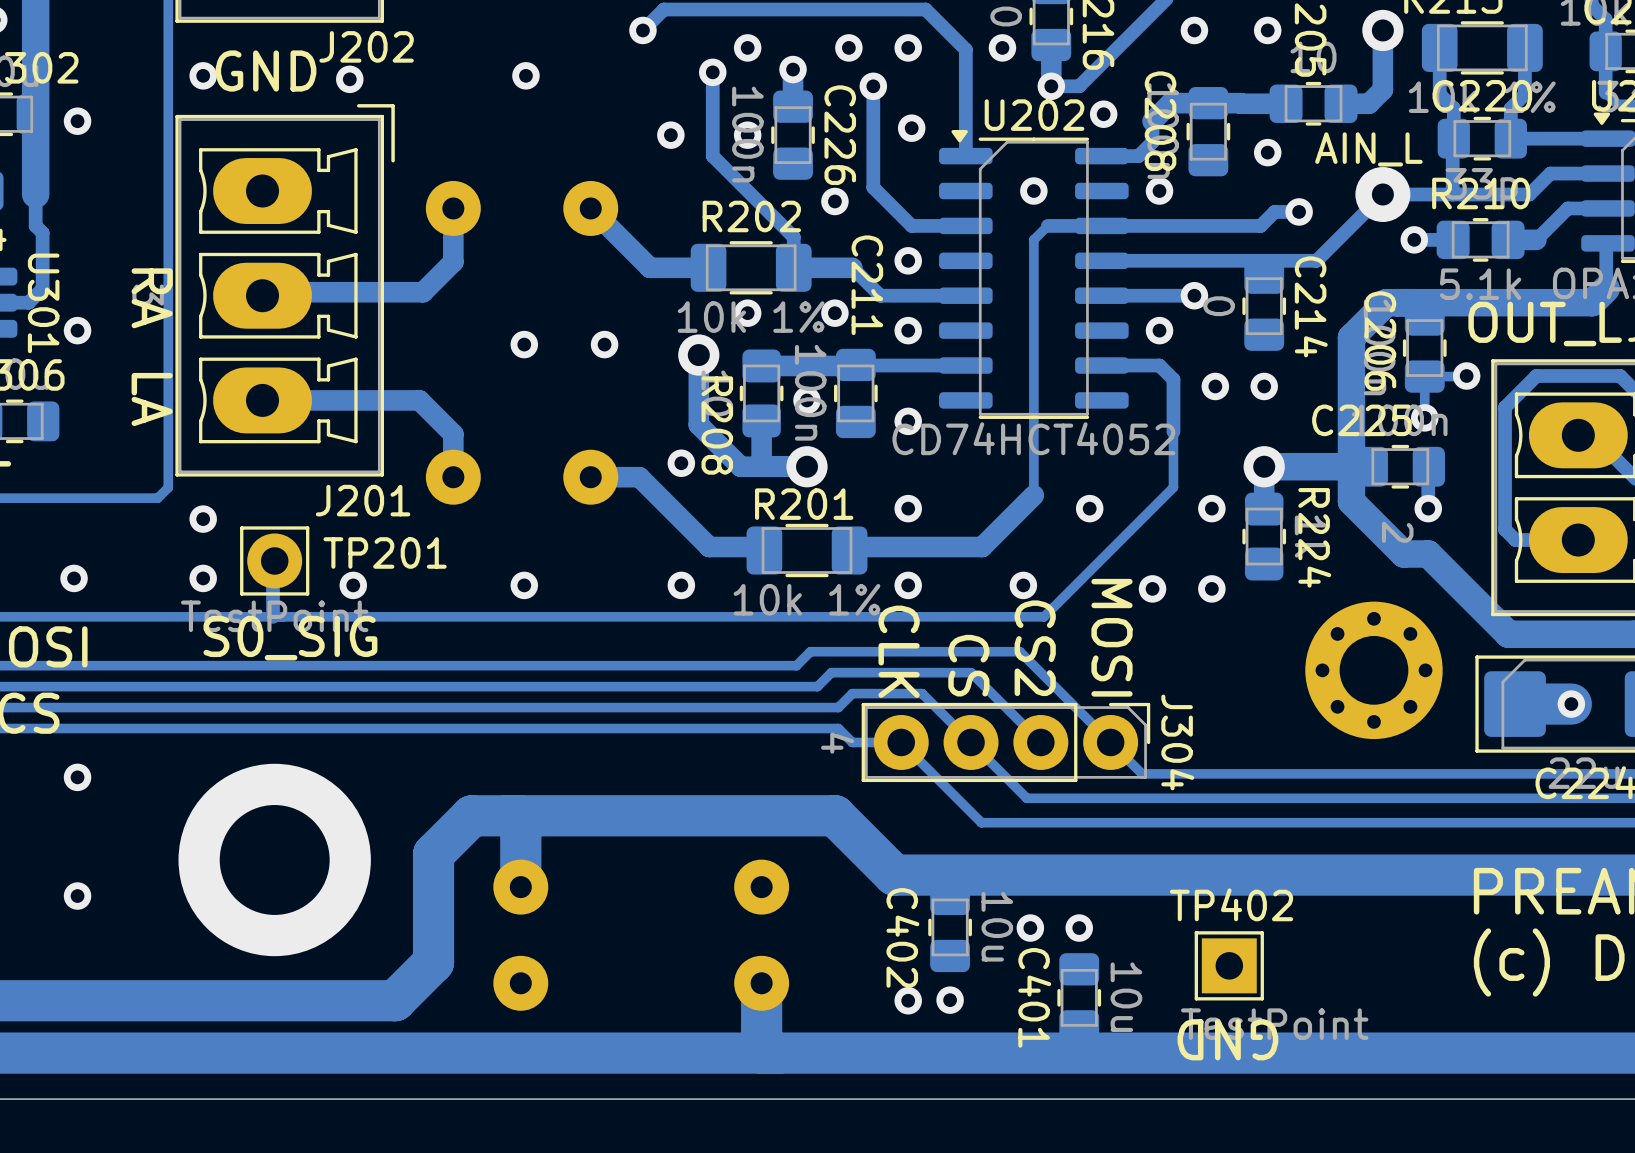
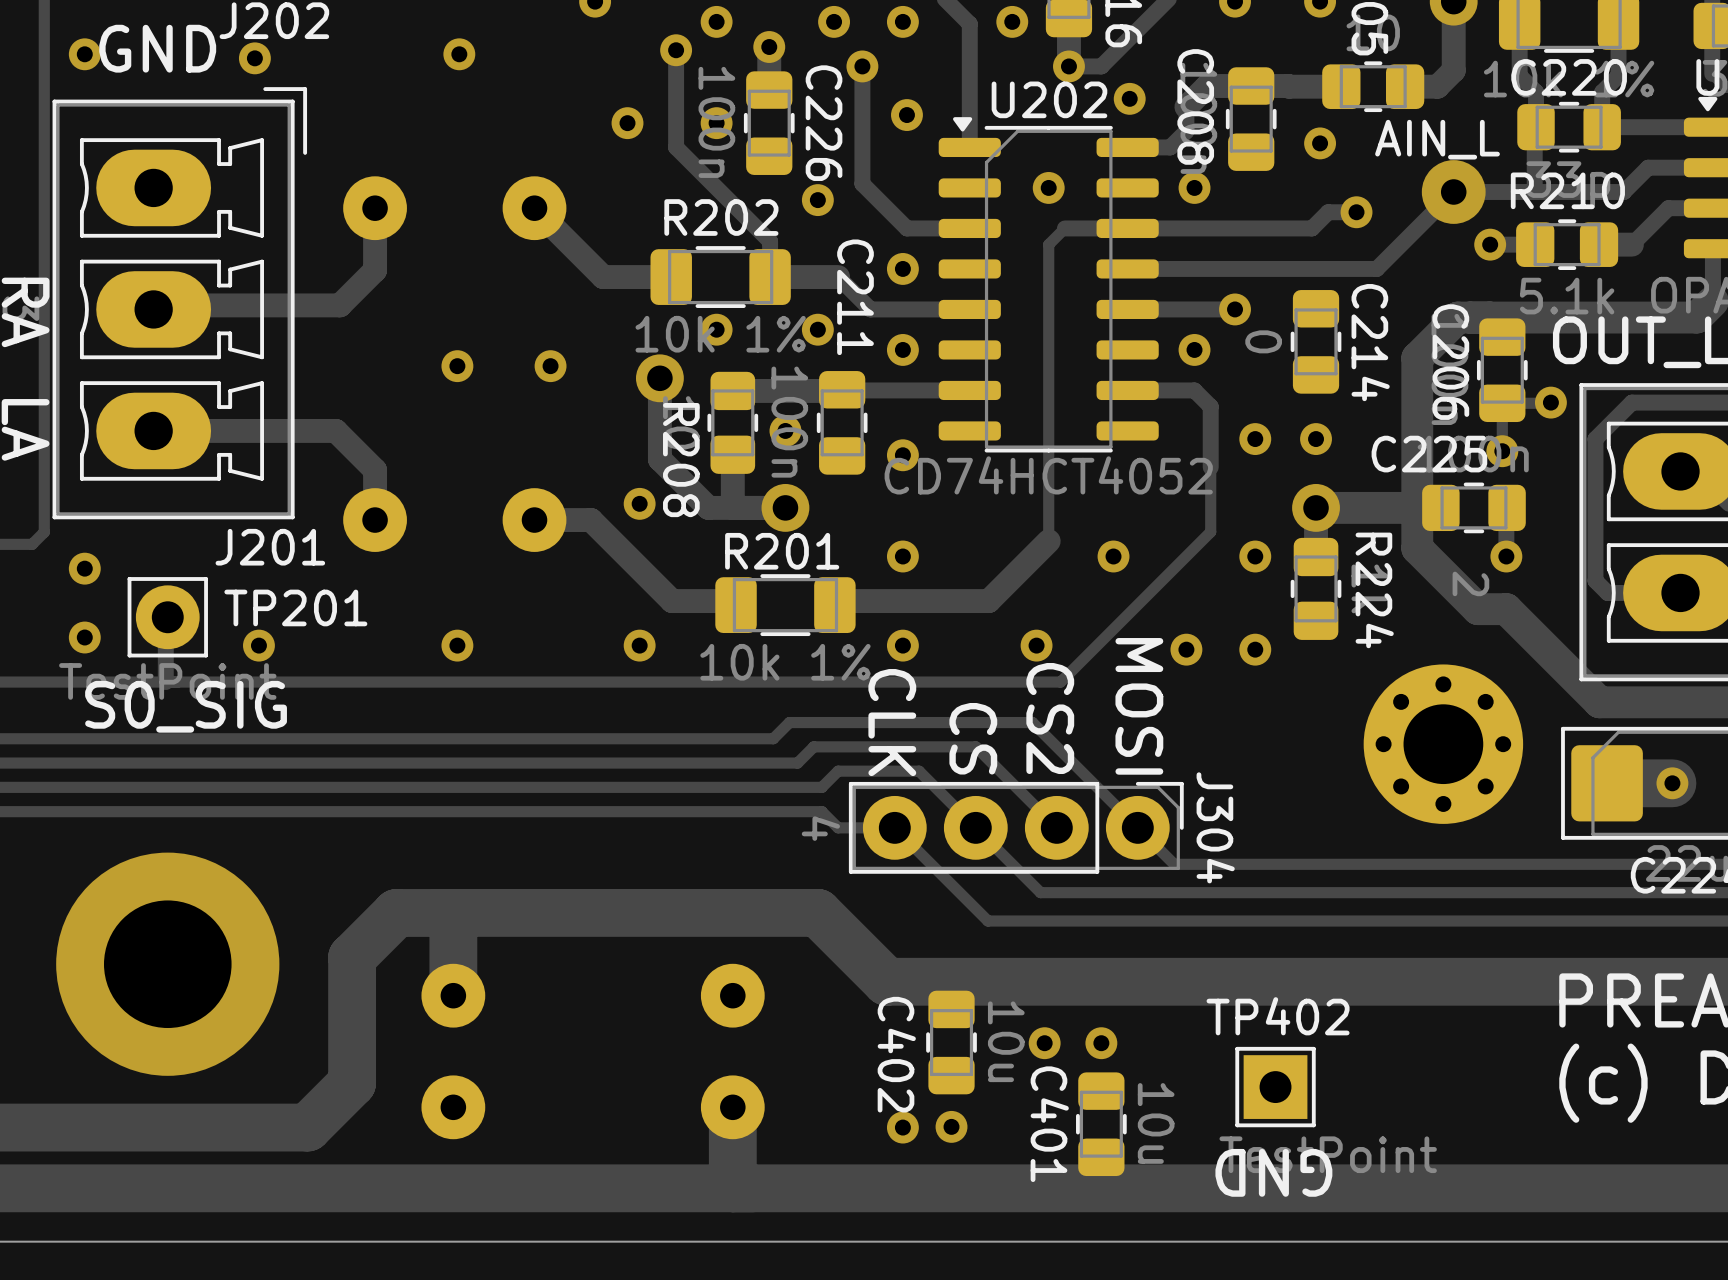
C214 position: (1264, 306) -> (1316, 341)
via position: (1215, 386) -> (1255, 439)
via position: (1264, 386) -> (1316, 439)

